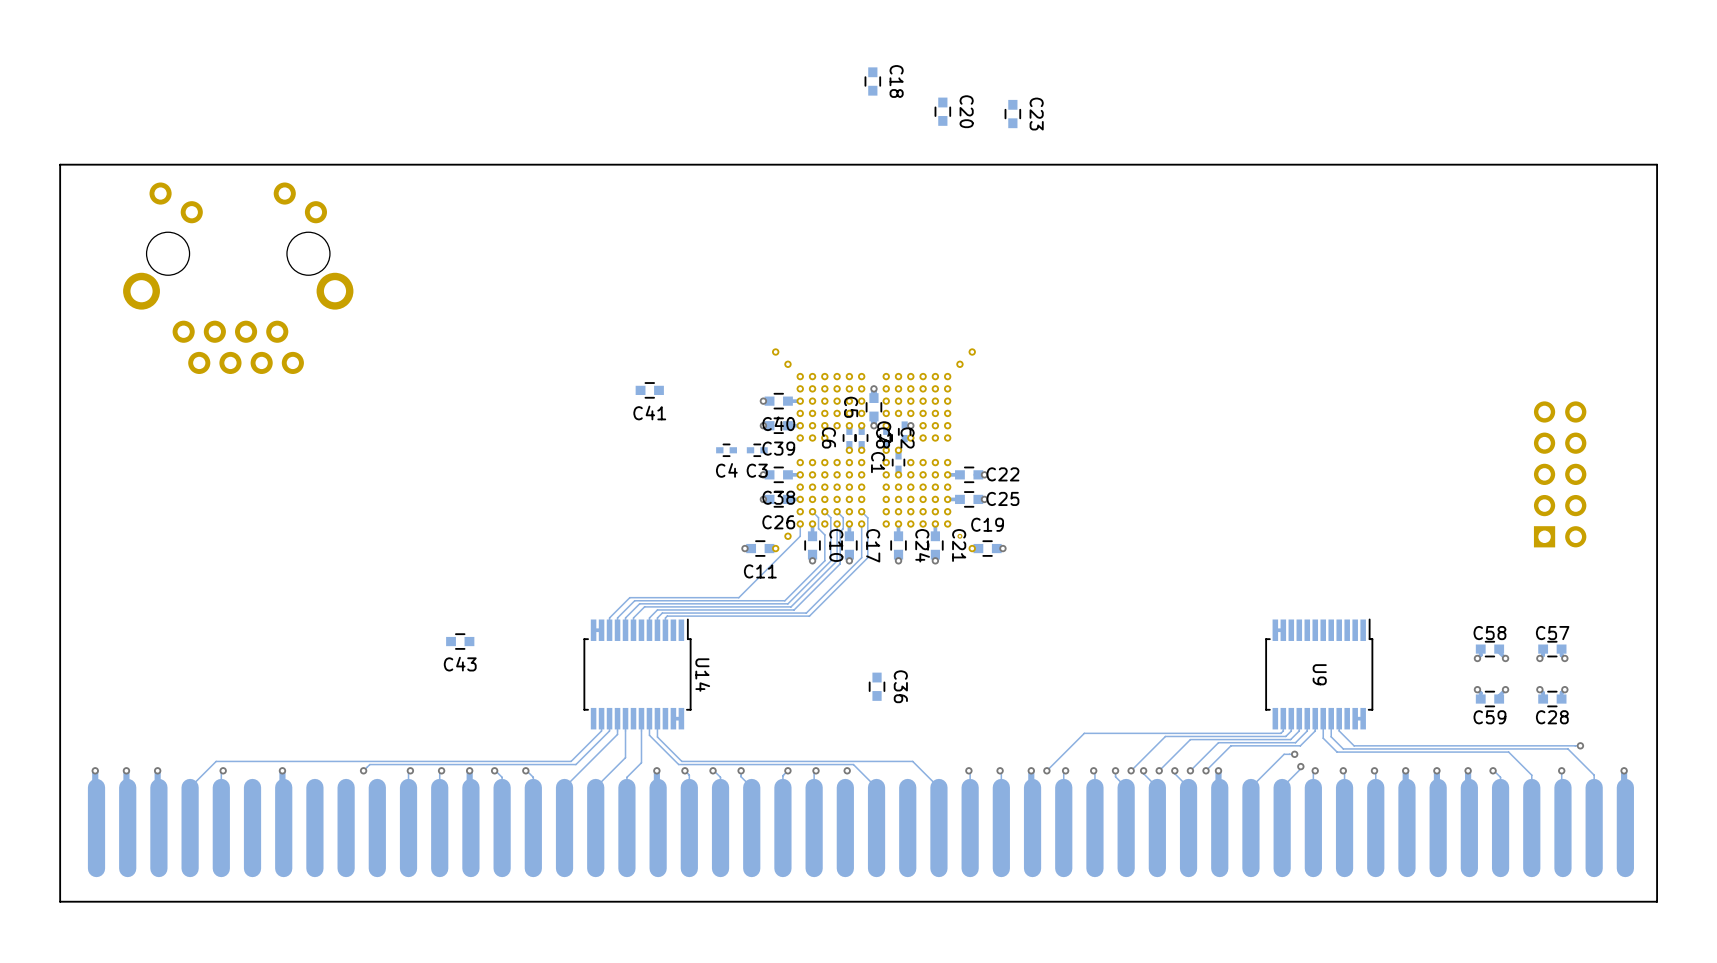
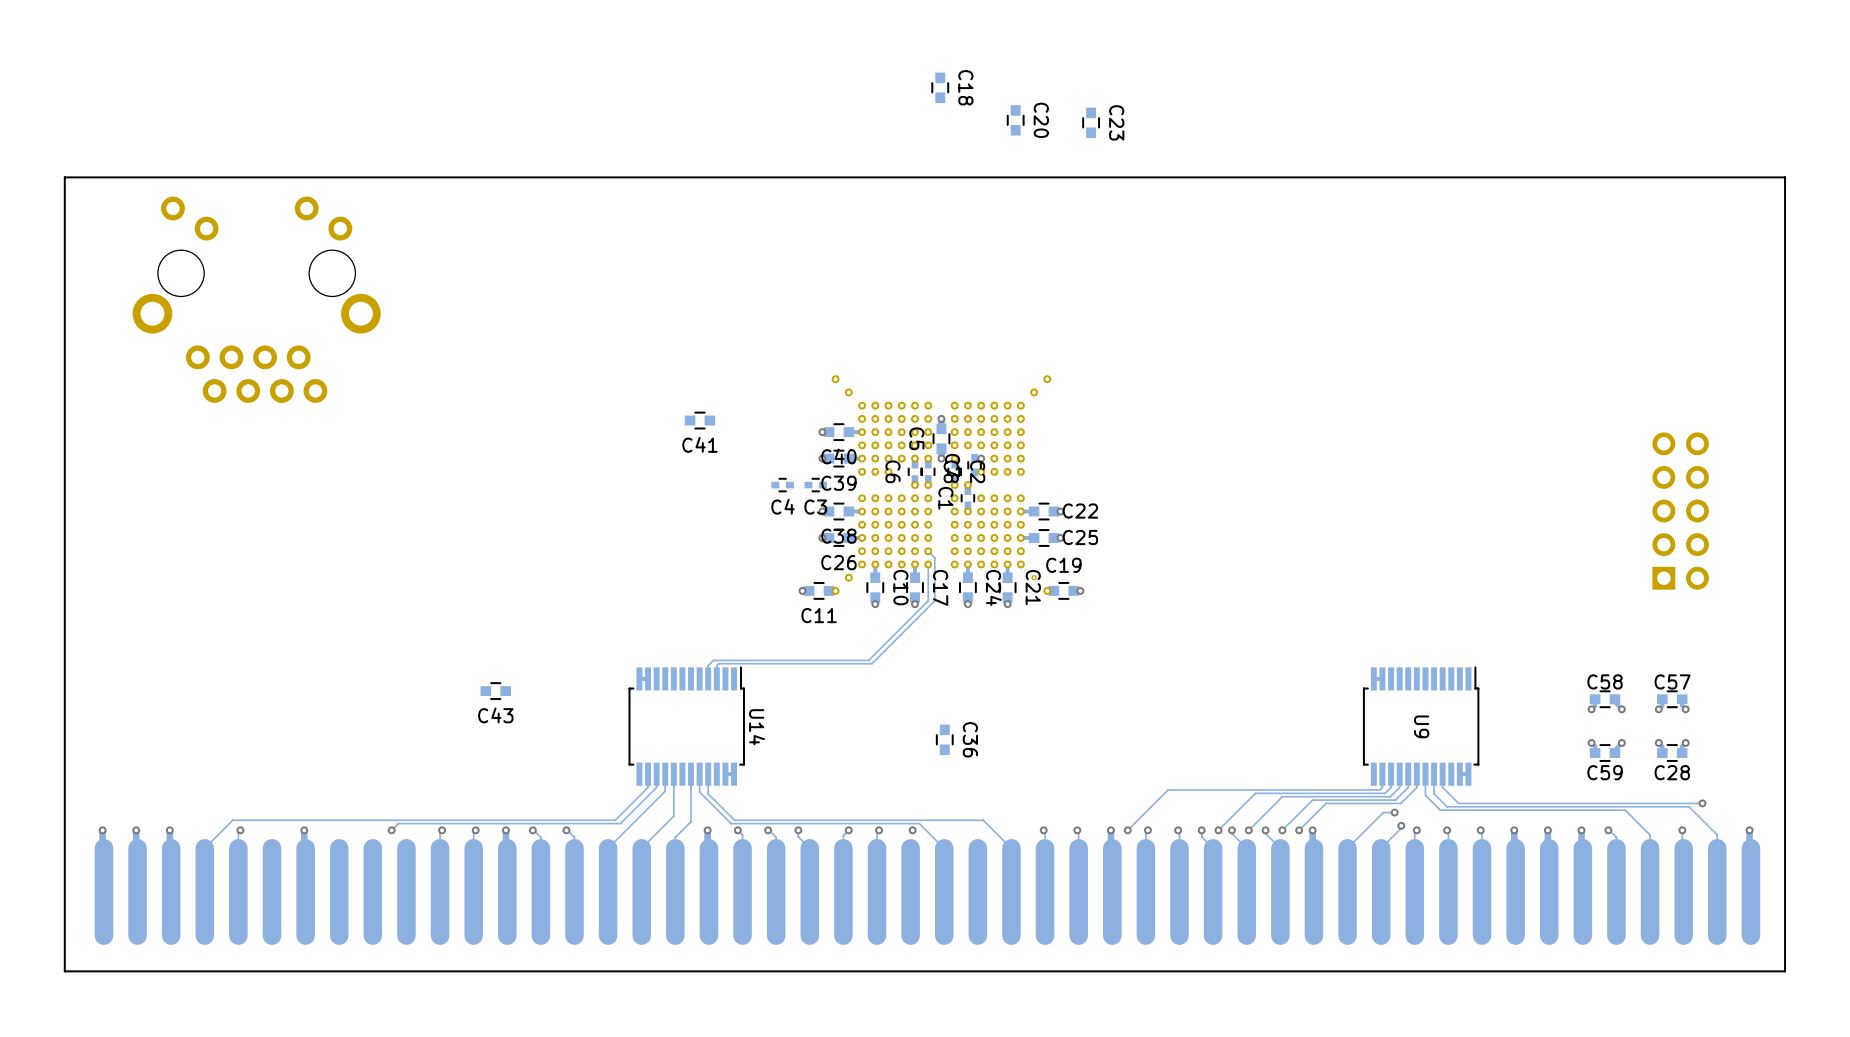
track: (812, 511) (818, 517) (818, 528) (824, 534) (824, 560) (784, 600) (634, 600) (617, 617) (617, 630) -> none
track: (824, 511) (830, 517) (830, 560) (787, 603) (639, 603) (625, 617) (625, 630) -> none
track: (837, 511) (843, 517) (843, 528) (840, 531) (840, 563) (794, 609) (657, 609) (649, 617) (649, 630) -> none
track: (800, 523) (800, 536) (738, 597) (629, 597) (609, 617) (609, 630) -> none
track: (837, 523) (837, 560) (791, 606) (644, 606) (633, 617) (633, 630) -> none

